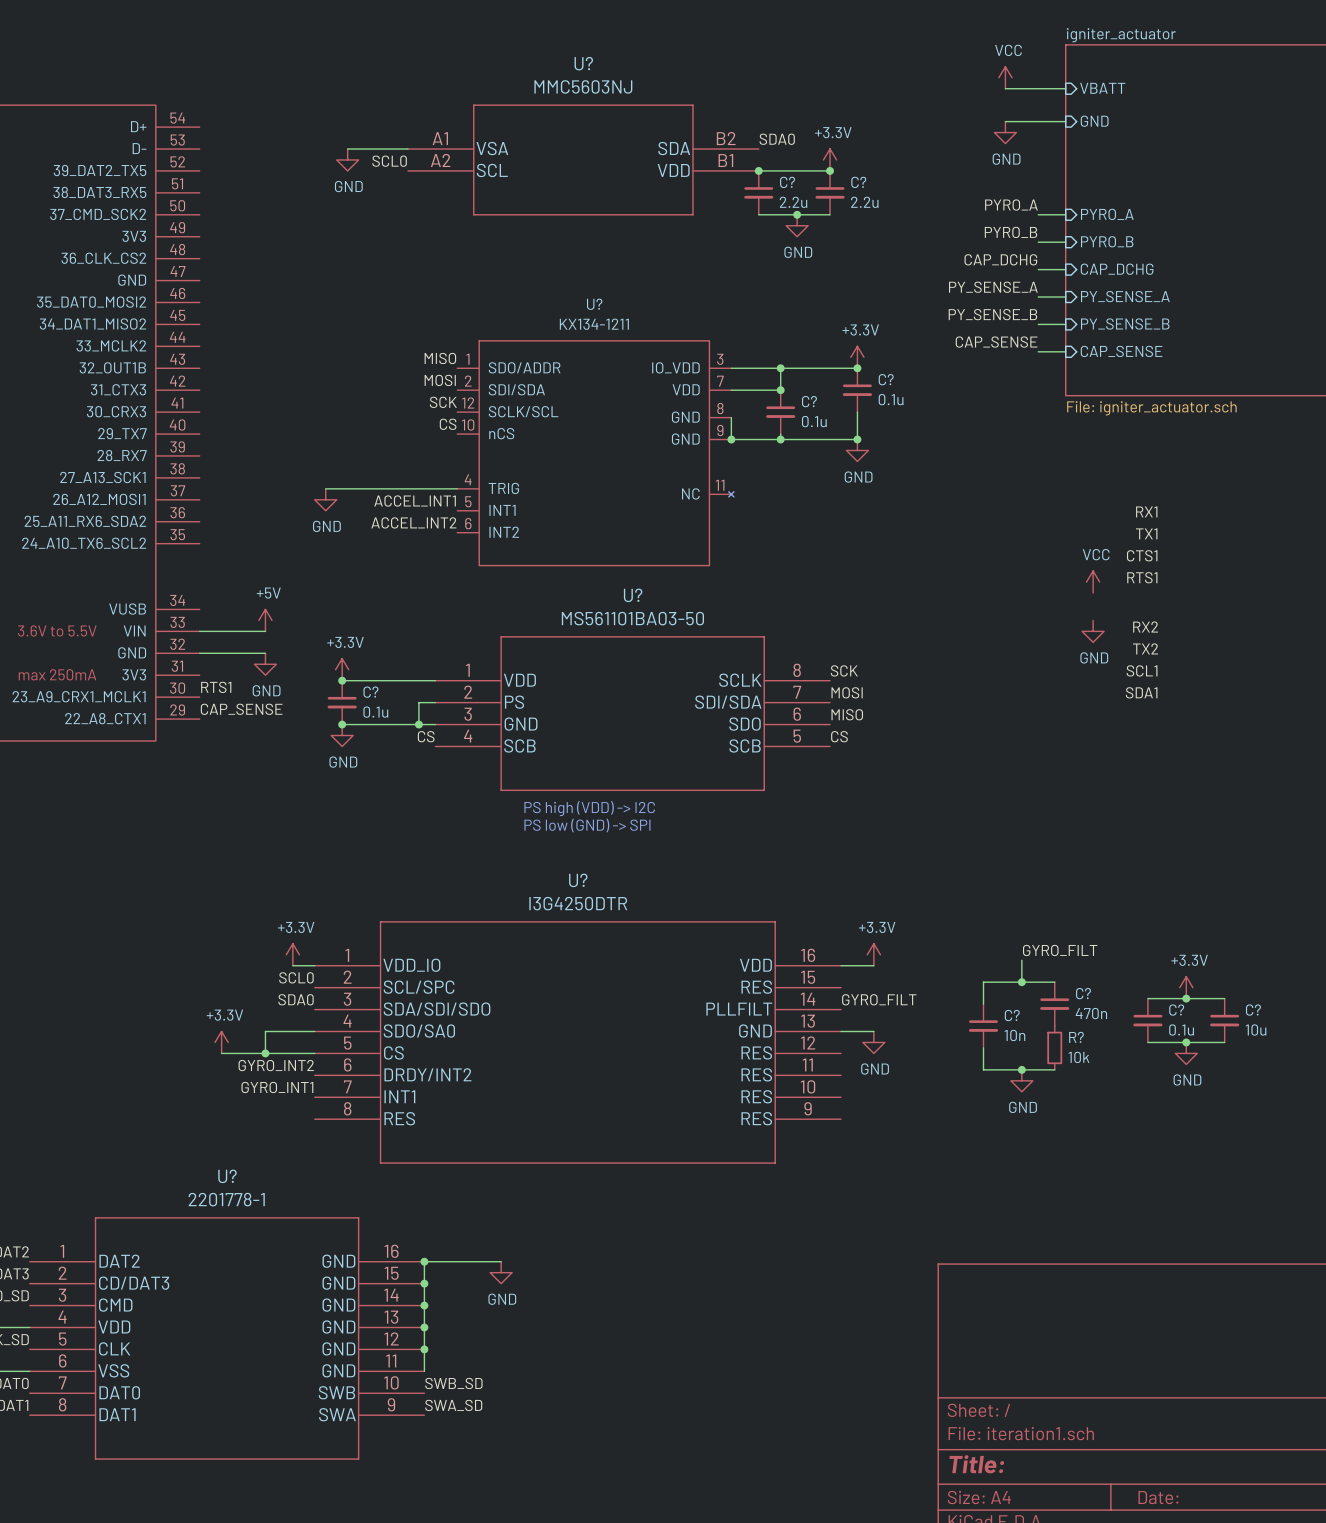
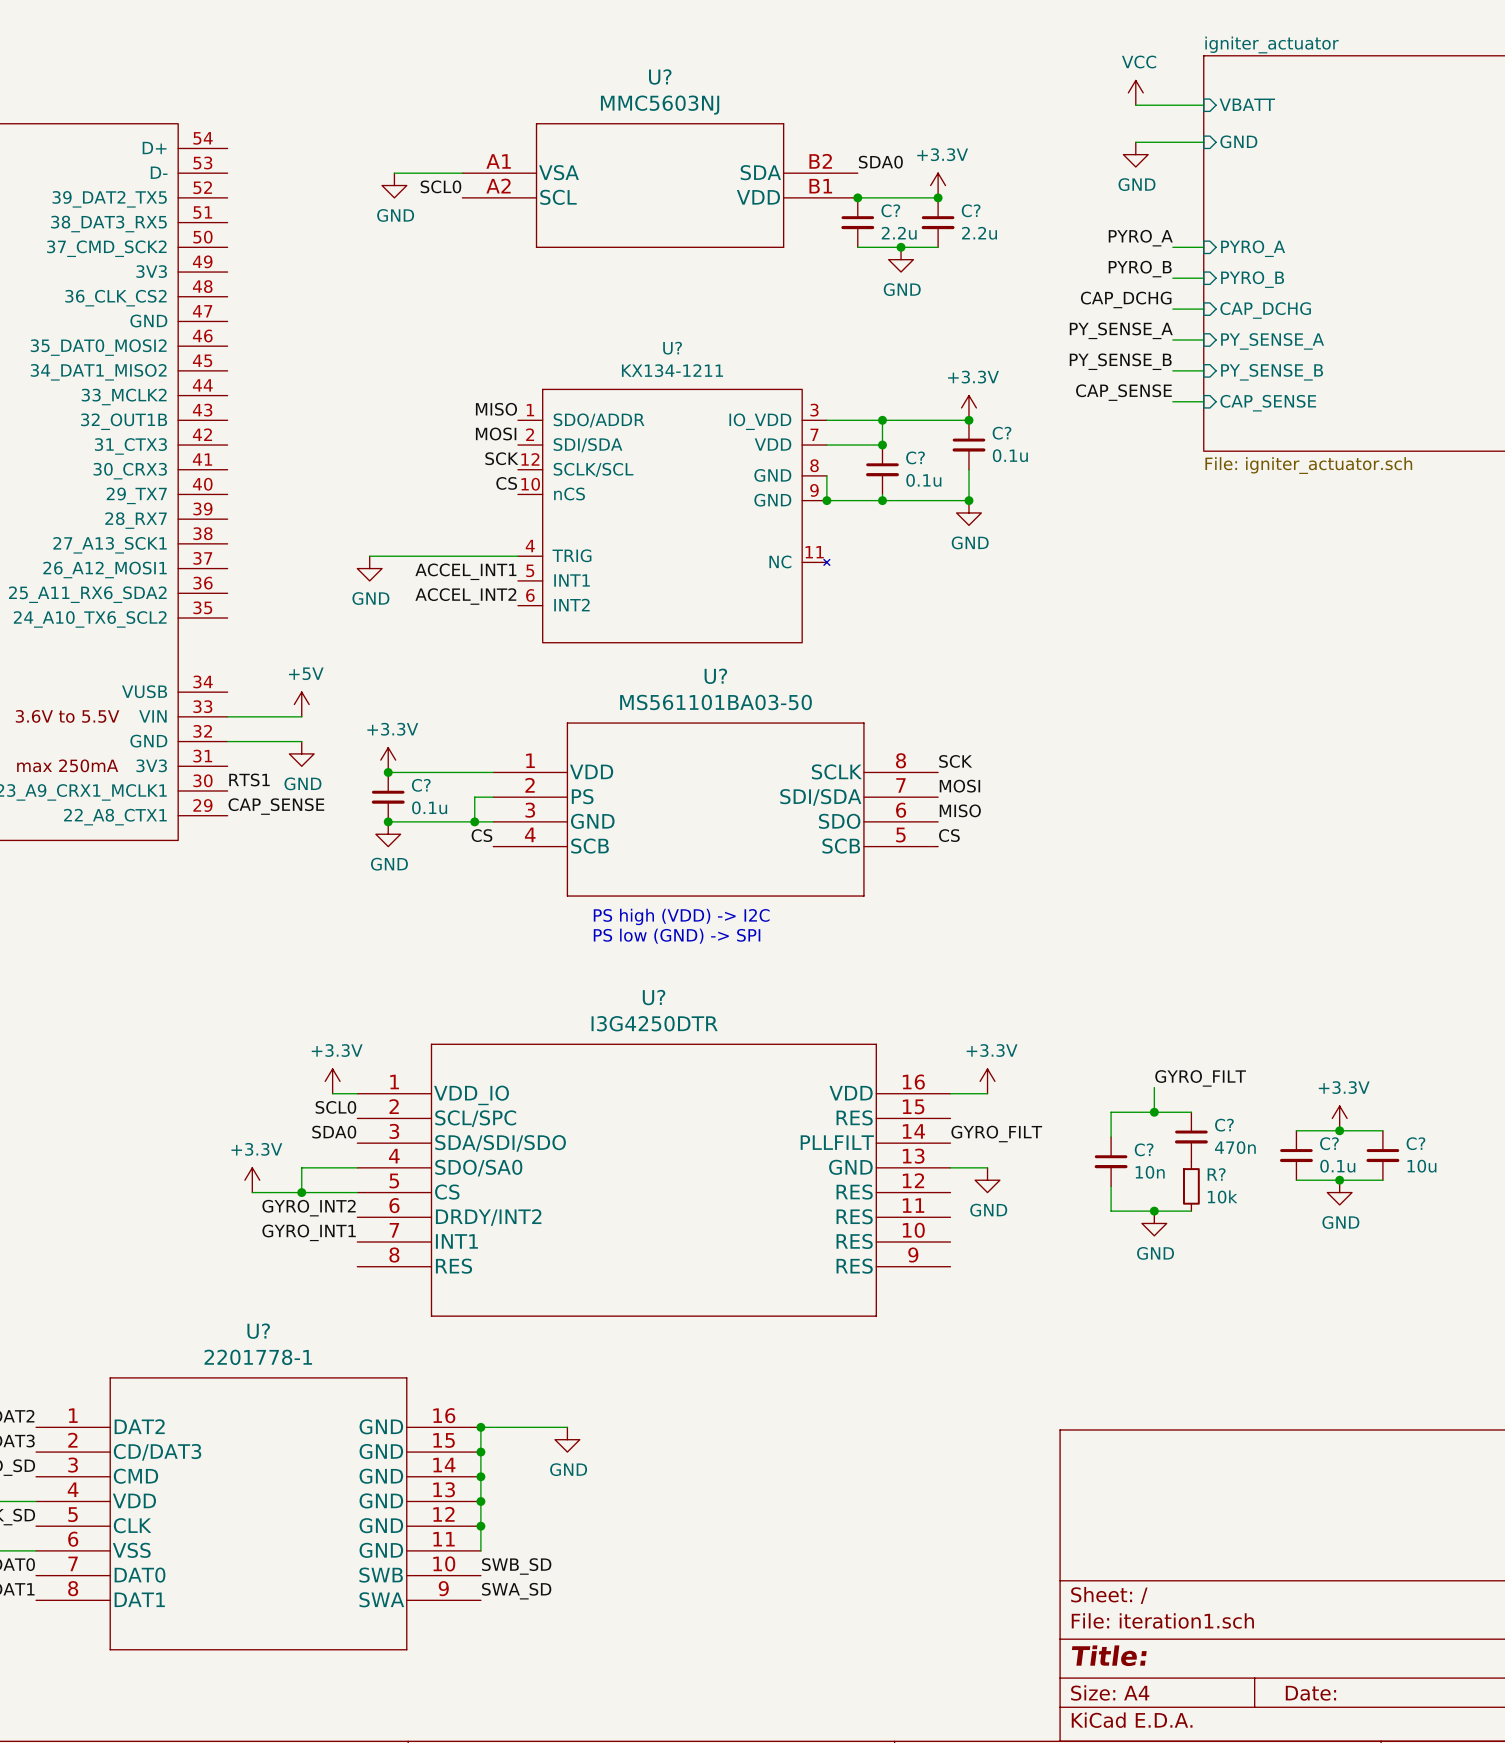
label: RX1 (1146, 511) -> none
label: TX1 (1146, 533) -> none
label: CTS1 (1142, 555) -> none
label: RTS1 (1142, 577) -> none
power symbol: VCC (1093, 582) -> none
label: RX2 (1145, 627) -> none
power symbol: GND (1093, 631) -> none
label: TX2 (1145, 648) -> none
label: SCL1 (1142, 670) -> none
label: SDA1 (1141, 692) -> none

